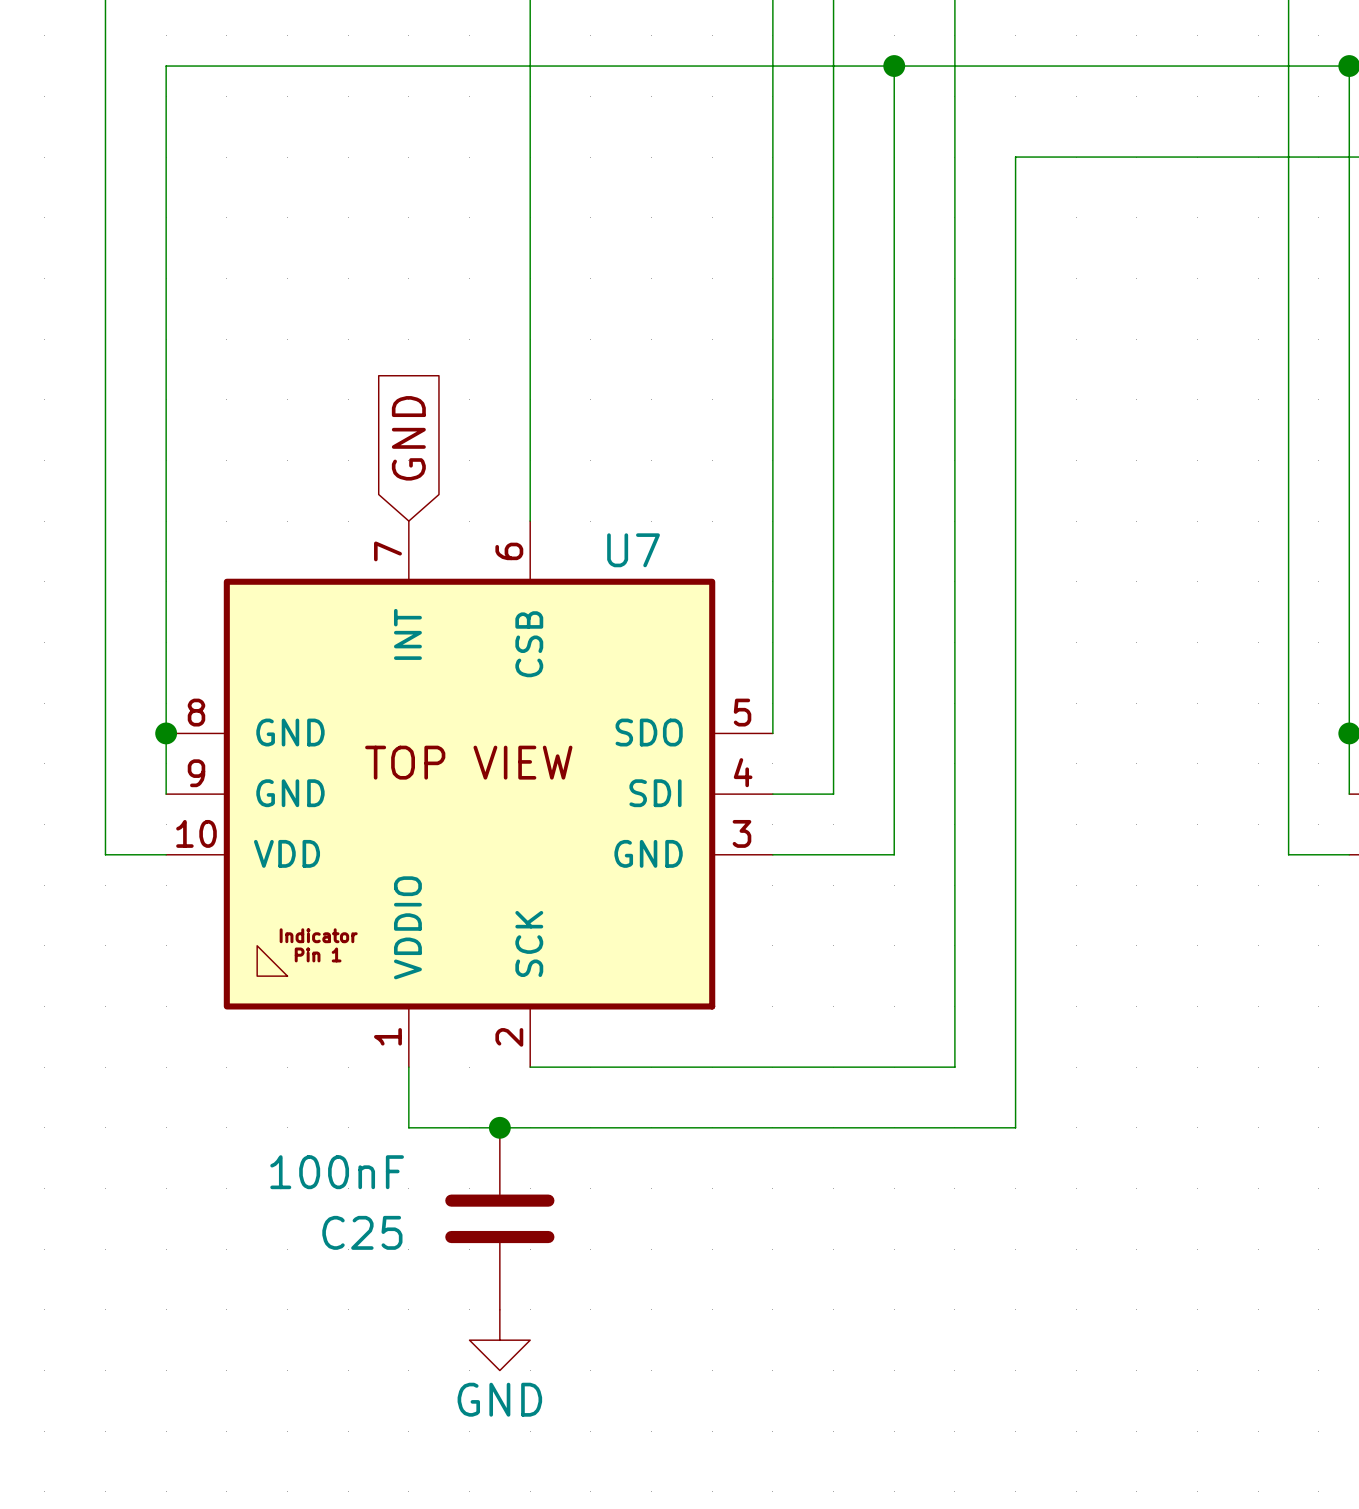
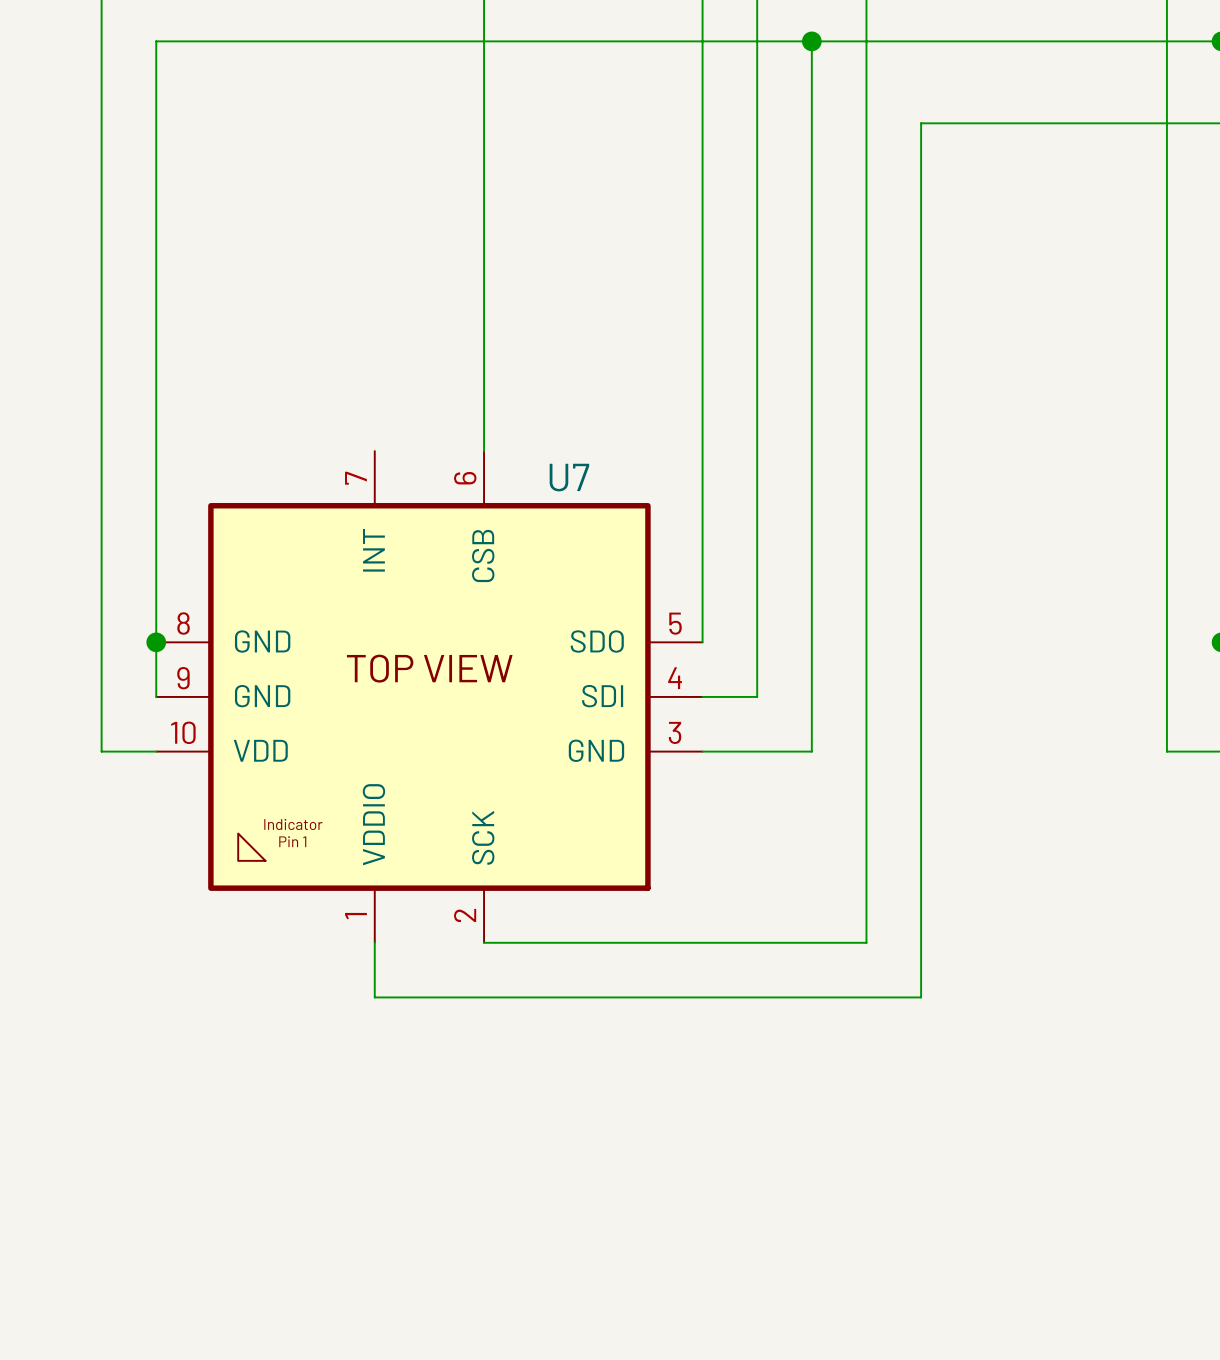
global label: GND (408, 438) -> none
junction: (499, 1127) -> none
C25: 100nF (499, 1218) -> none
power symbol: GND (499, 1340) -> none

